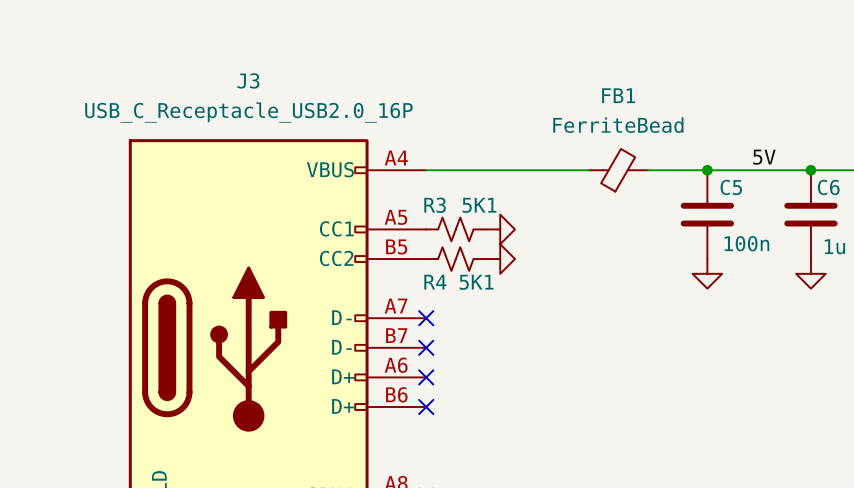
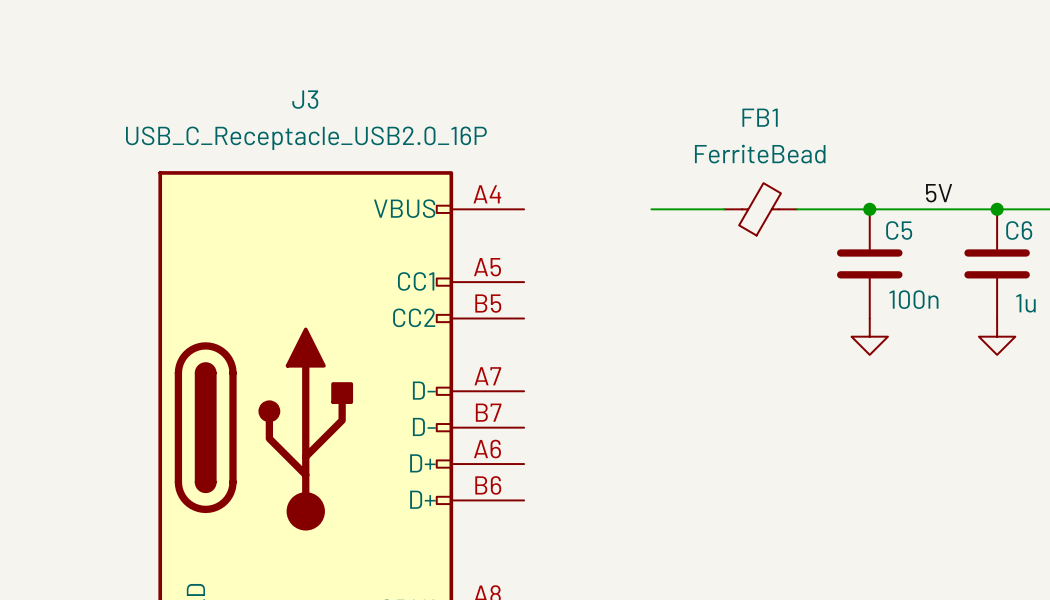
wire: (426, 170) (529, 170) -> none
R3: 5K1 (455, 229) -> none
power symbol: (500, 229) -> none
R4: 5K1 (455, 259) -> none
power symbol: (500, 259) -> none
no-connect mark: (426, 318) -> none
no-connect mark: (426, 347) -> none
no-connect mark: (426, 377) -> none
no-connect mark: (426, 407) -> none

